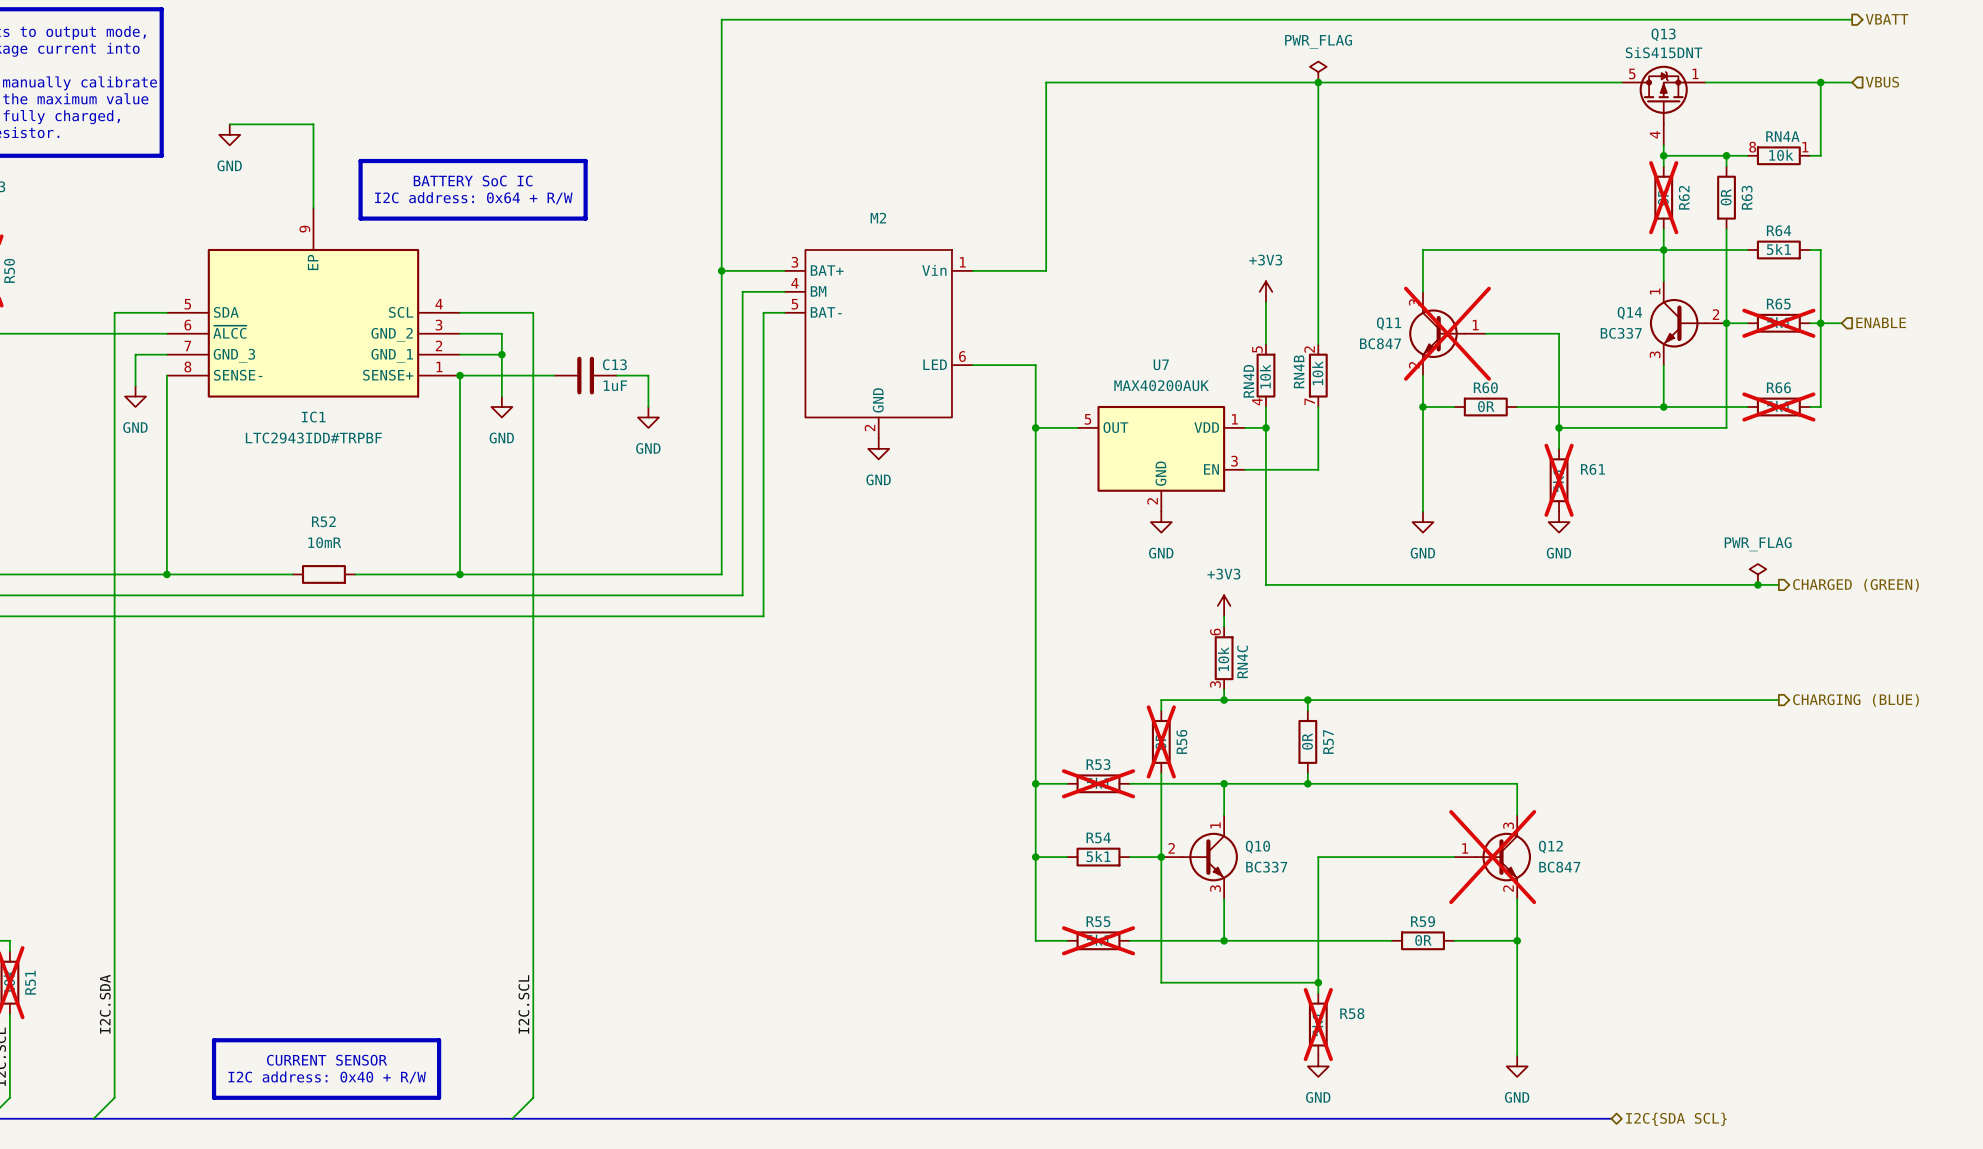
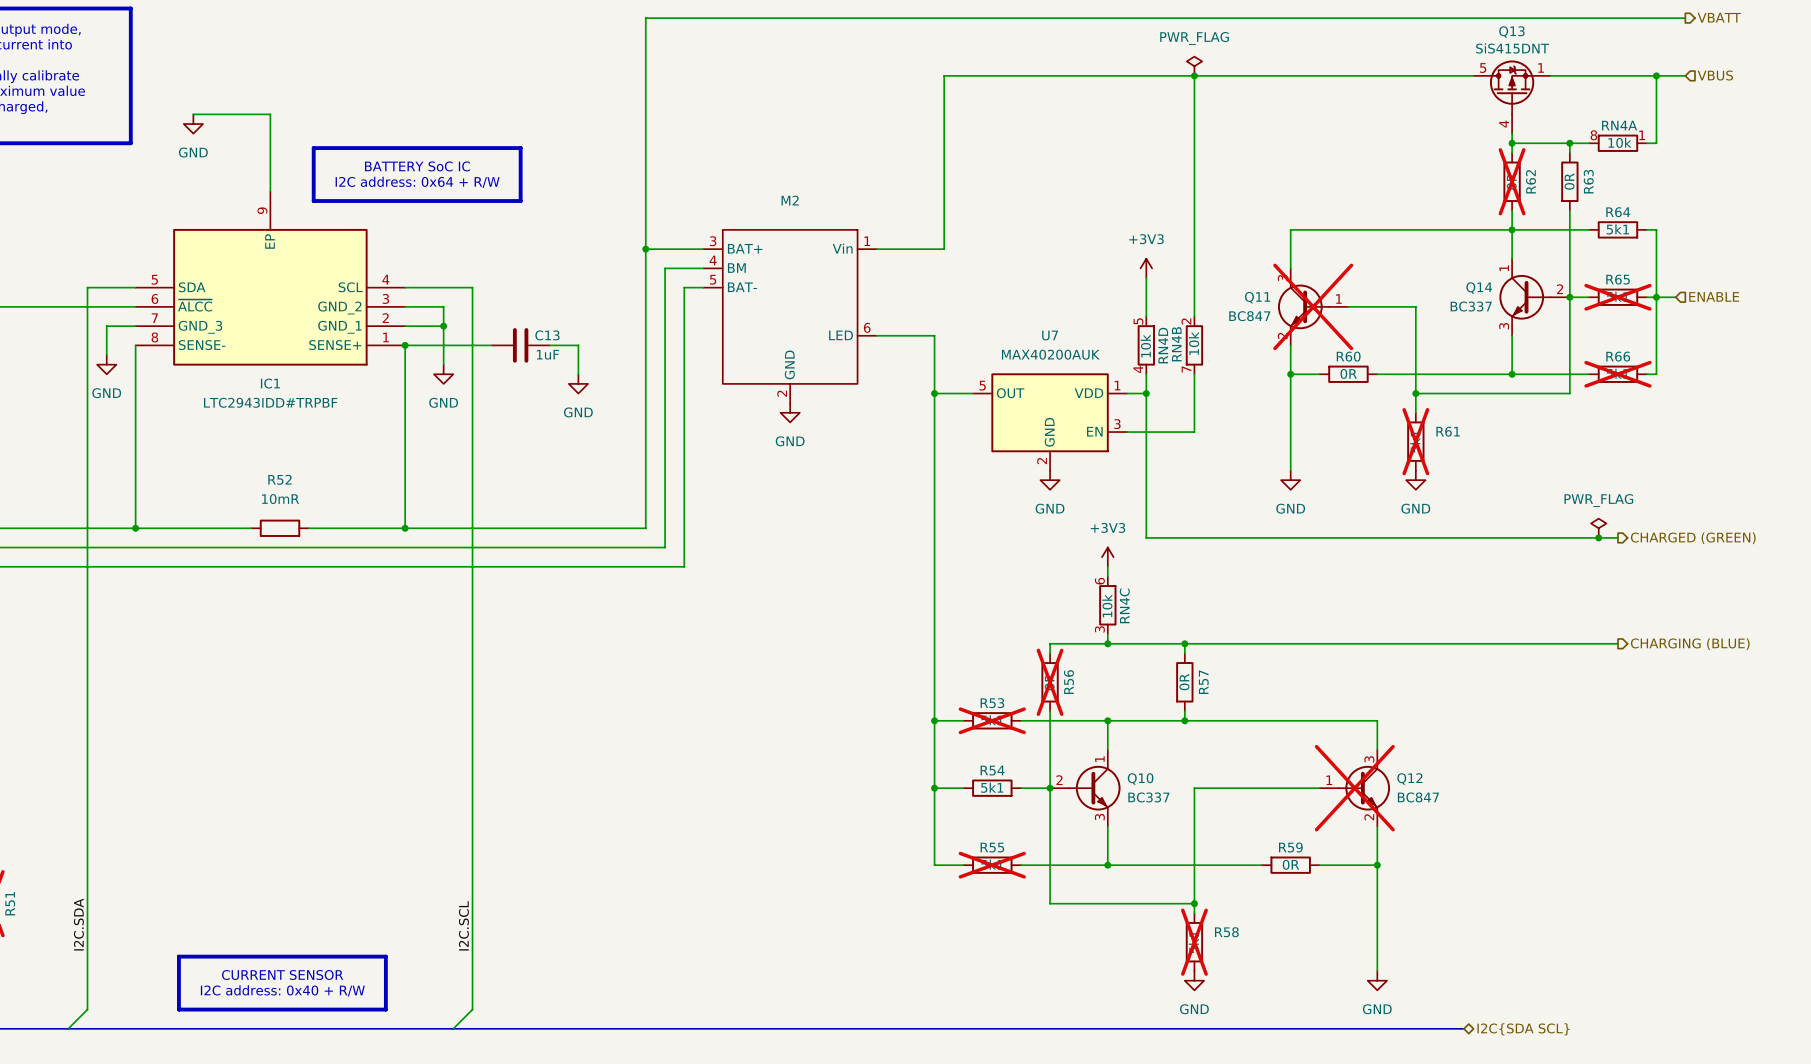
RN4D name position: RN4D (1248, 381) -> RN4D (1163, 345)

